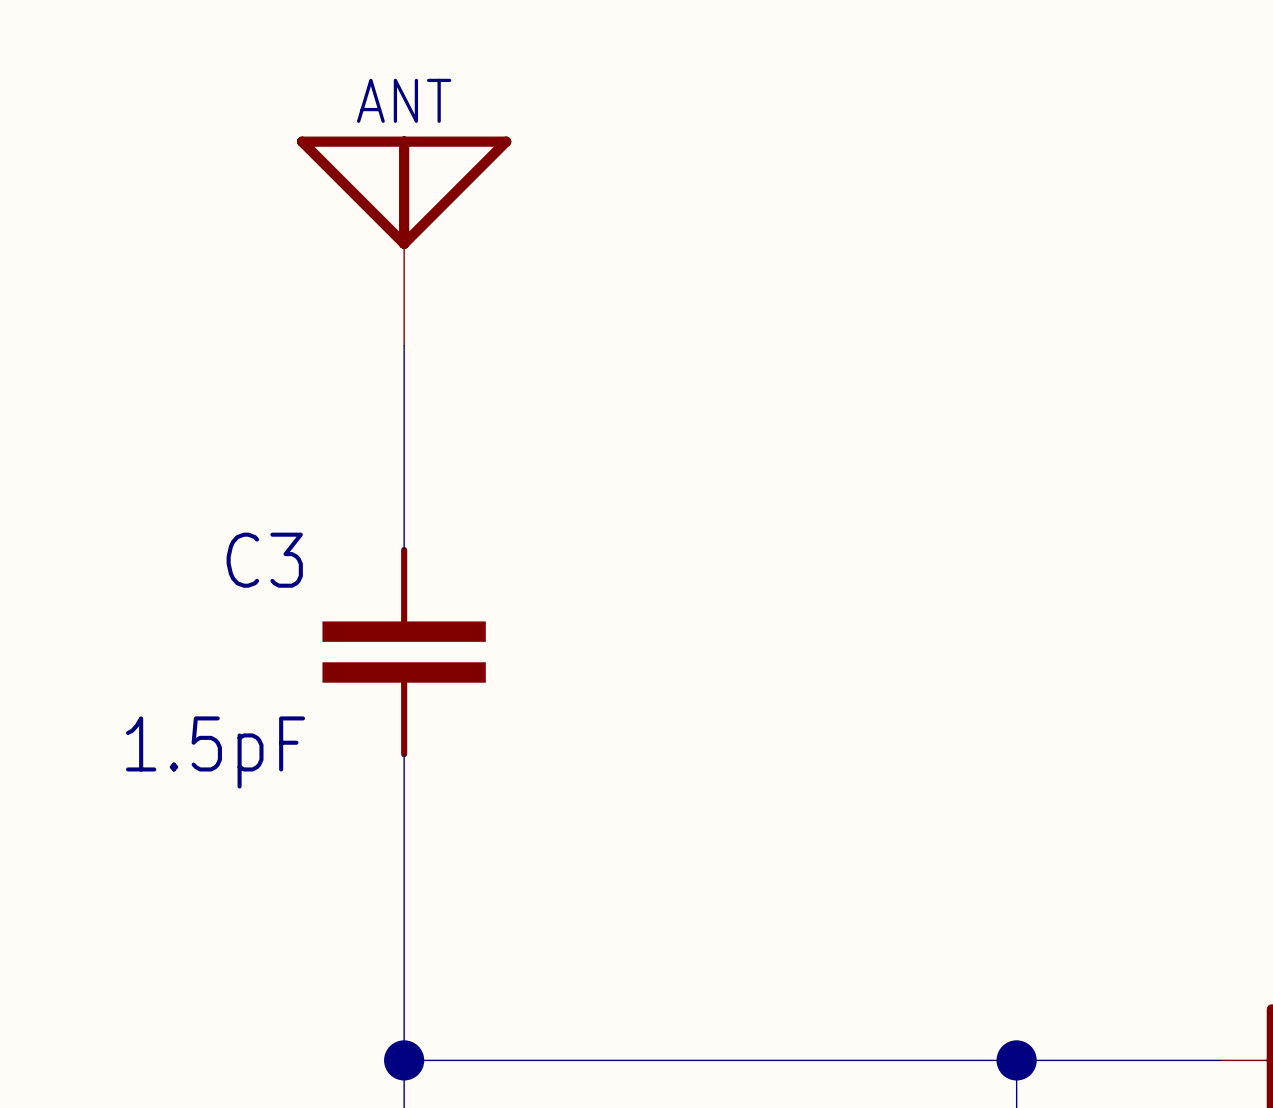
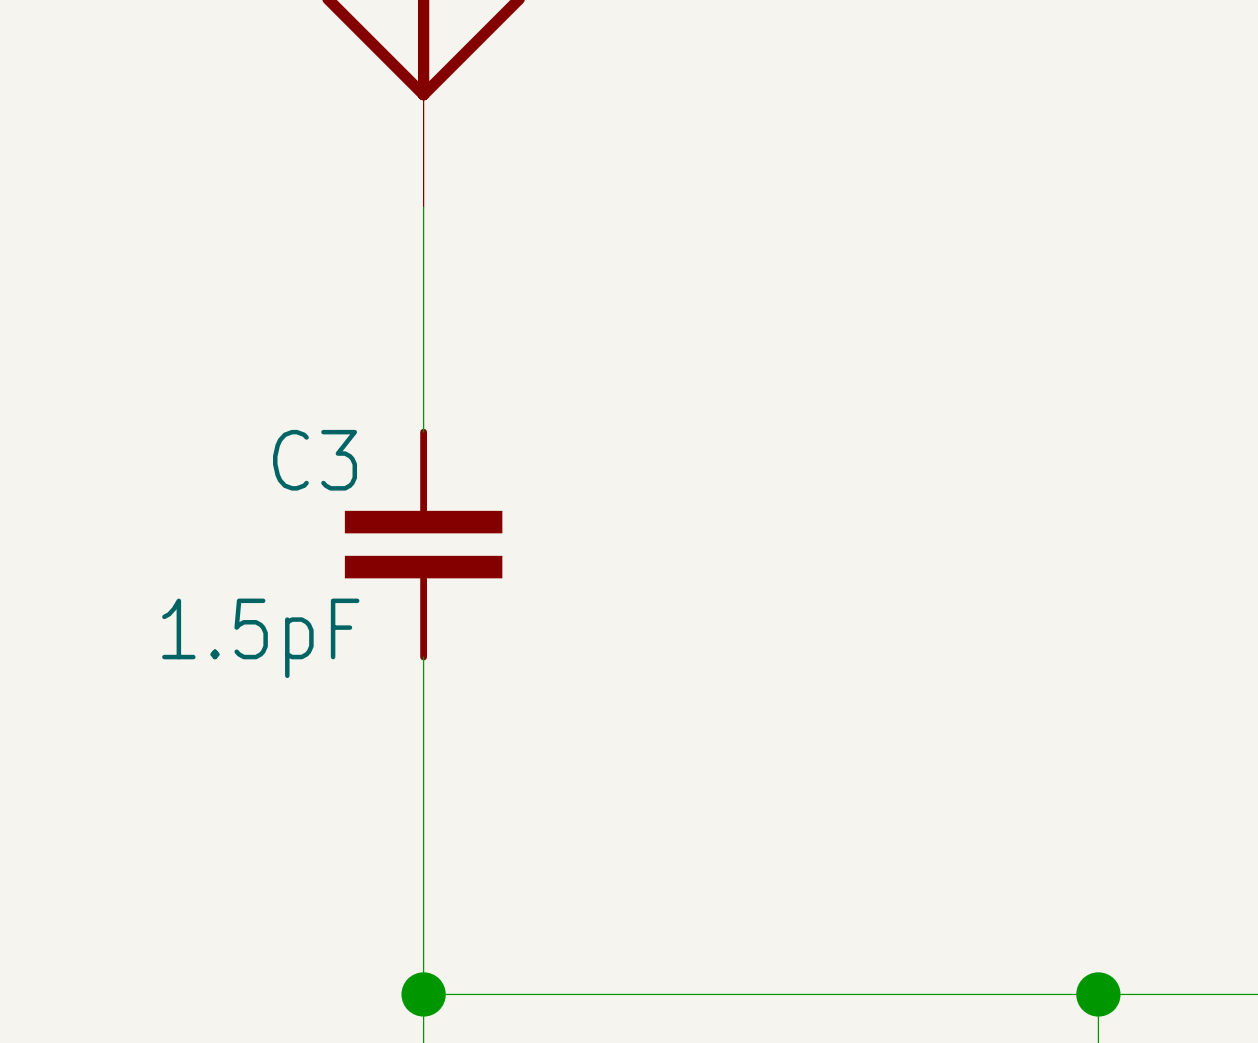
C3 symbol: [322, 546, 486, 758] -> [344, 428, 503, 661]
C3 name position: C3 (264, 560) -> C3 (315, 460)
C3 value position: 1.5pF (215, 752) -> 1.5pF (260, 638)

